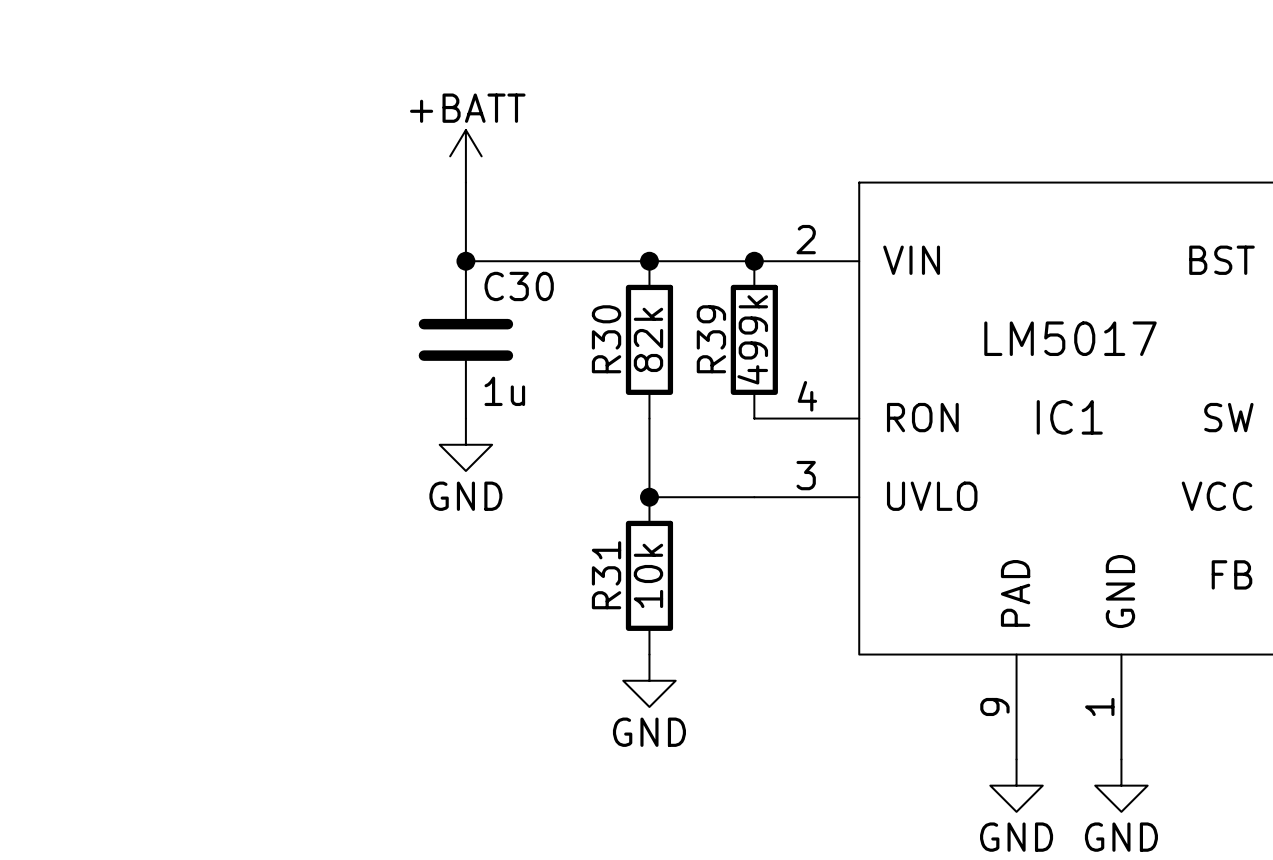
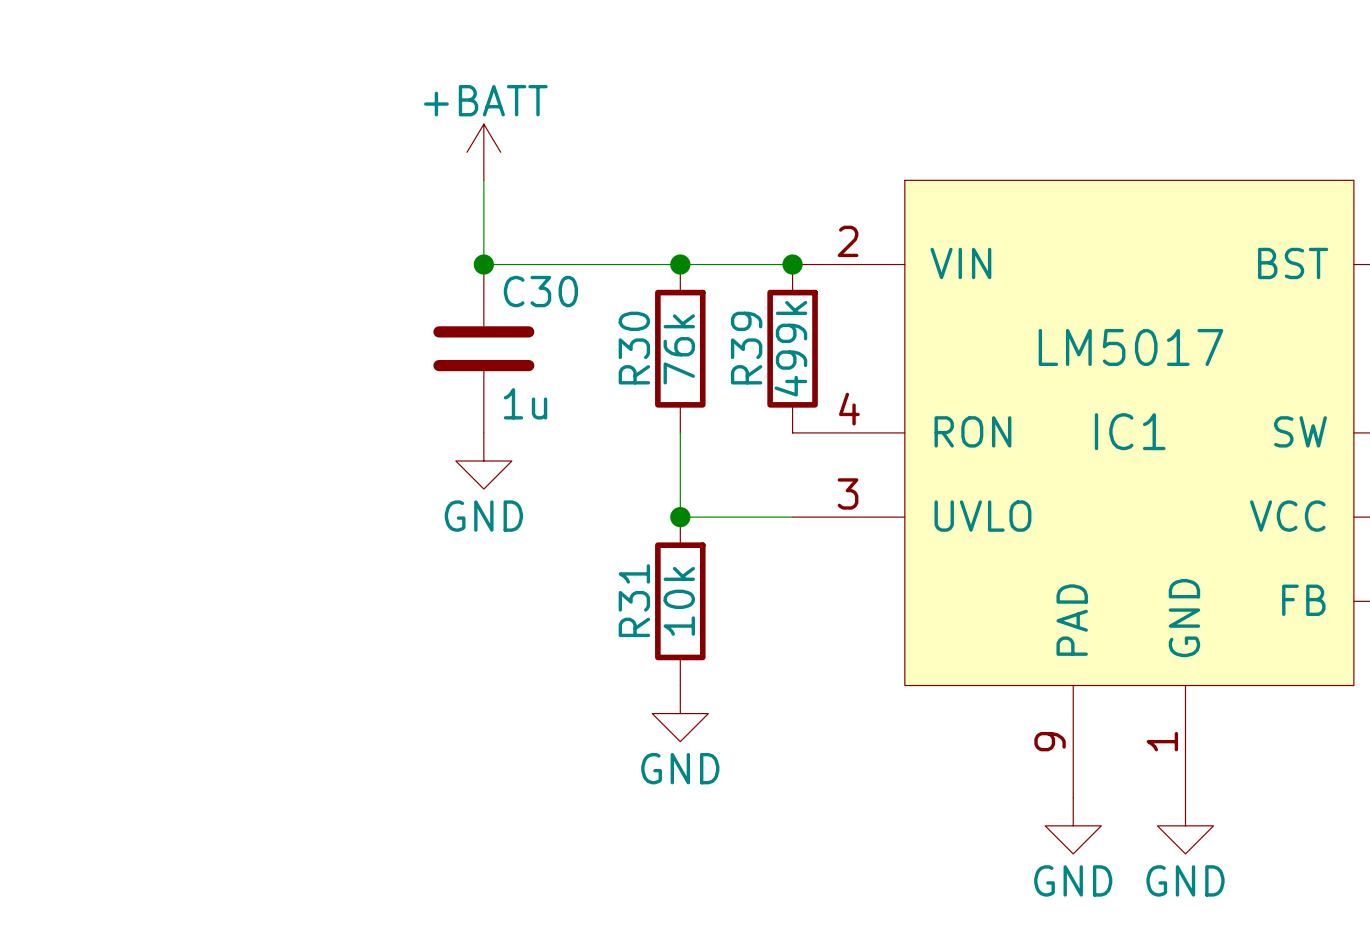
R30 value: 82k (648, 339) -> 76k (679, 349)

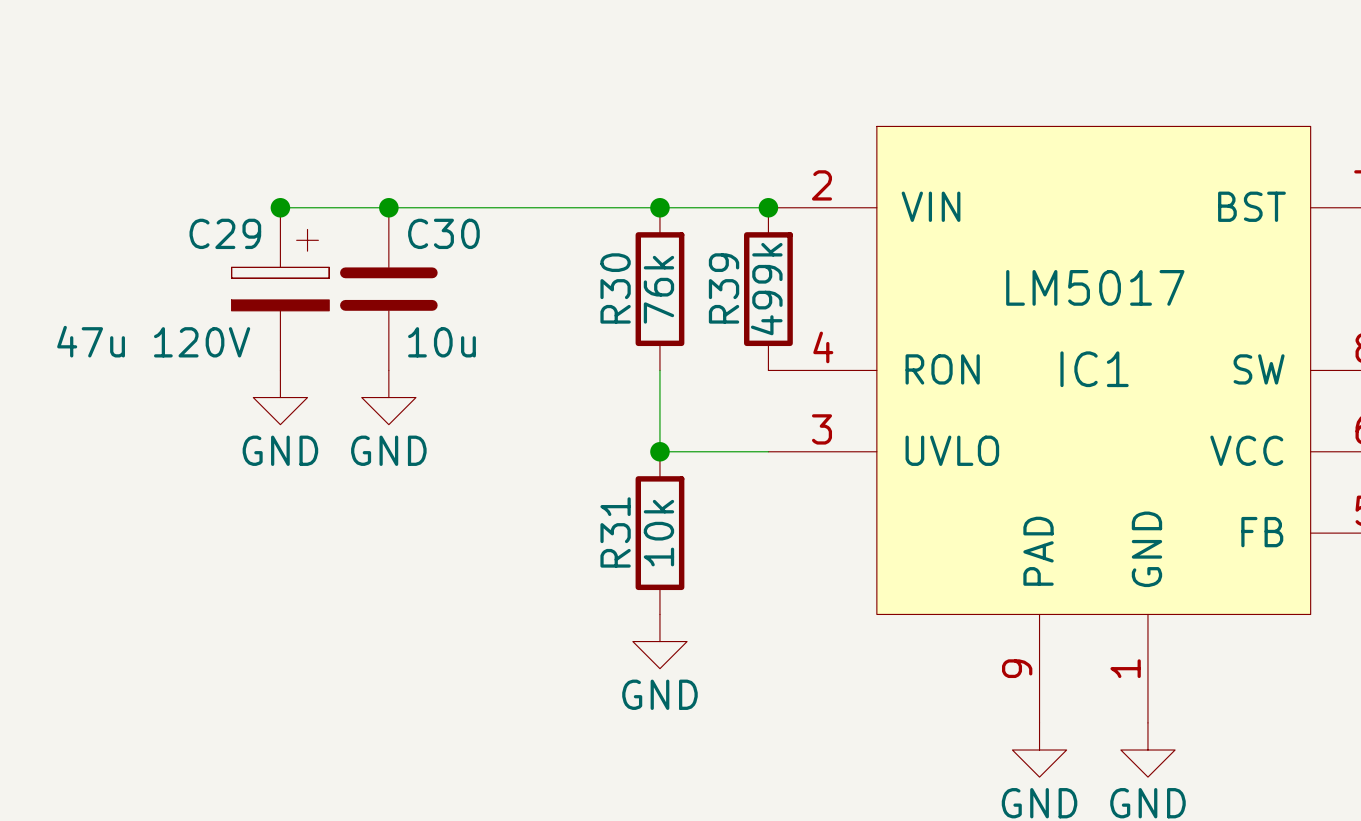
power symbol: +BATT (483, 152) -> none
wire: (483, 180) (483, 264) -> (280, 207) (470, 207)
junction: none -> (280, 207)
junction position: (483, 264) -> (388, 207)
C29: none -> 47u 120V (280, 289)
C30 position: (483, 348) -> (388, 289)
C30 value: 1u (525, 403) -> 10u (441, 342)
power symbol: none -> GND (280, 397)
power symbol position: GND (483, 460) -> GND (388, 397)

